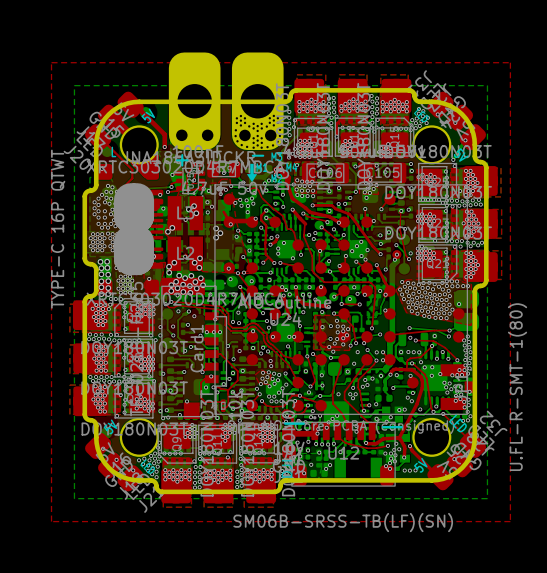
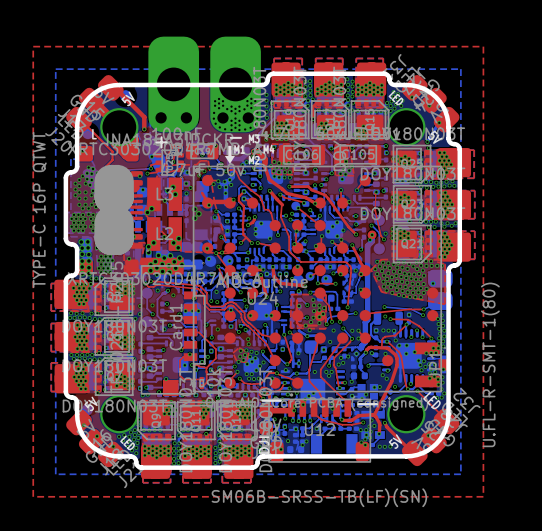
via: none -> (294, 244)

